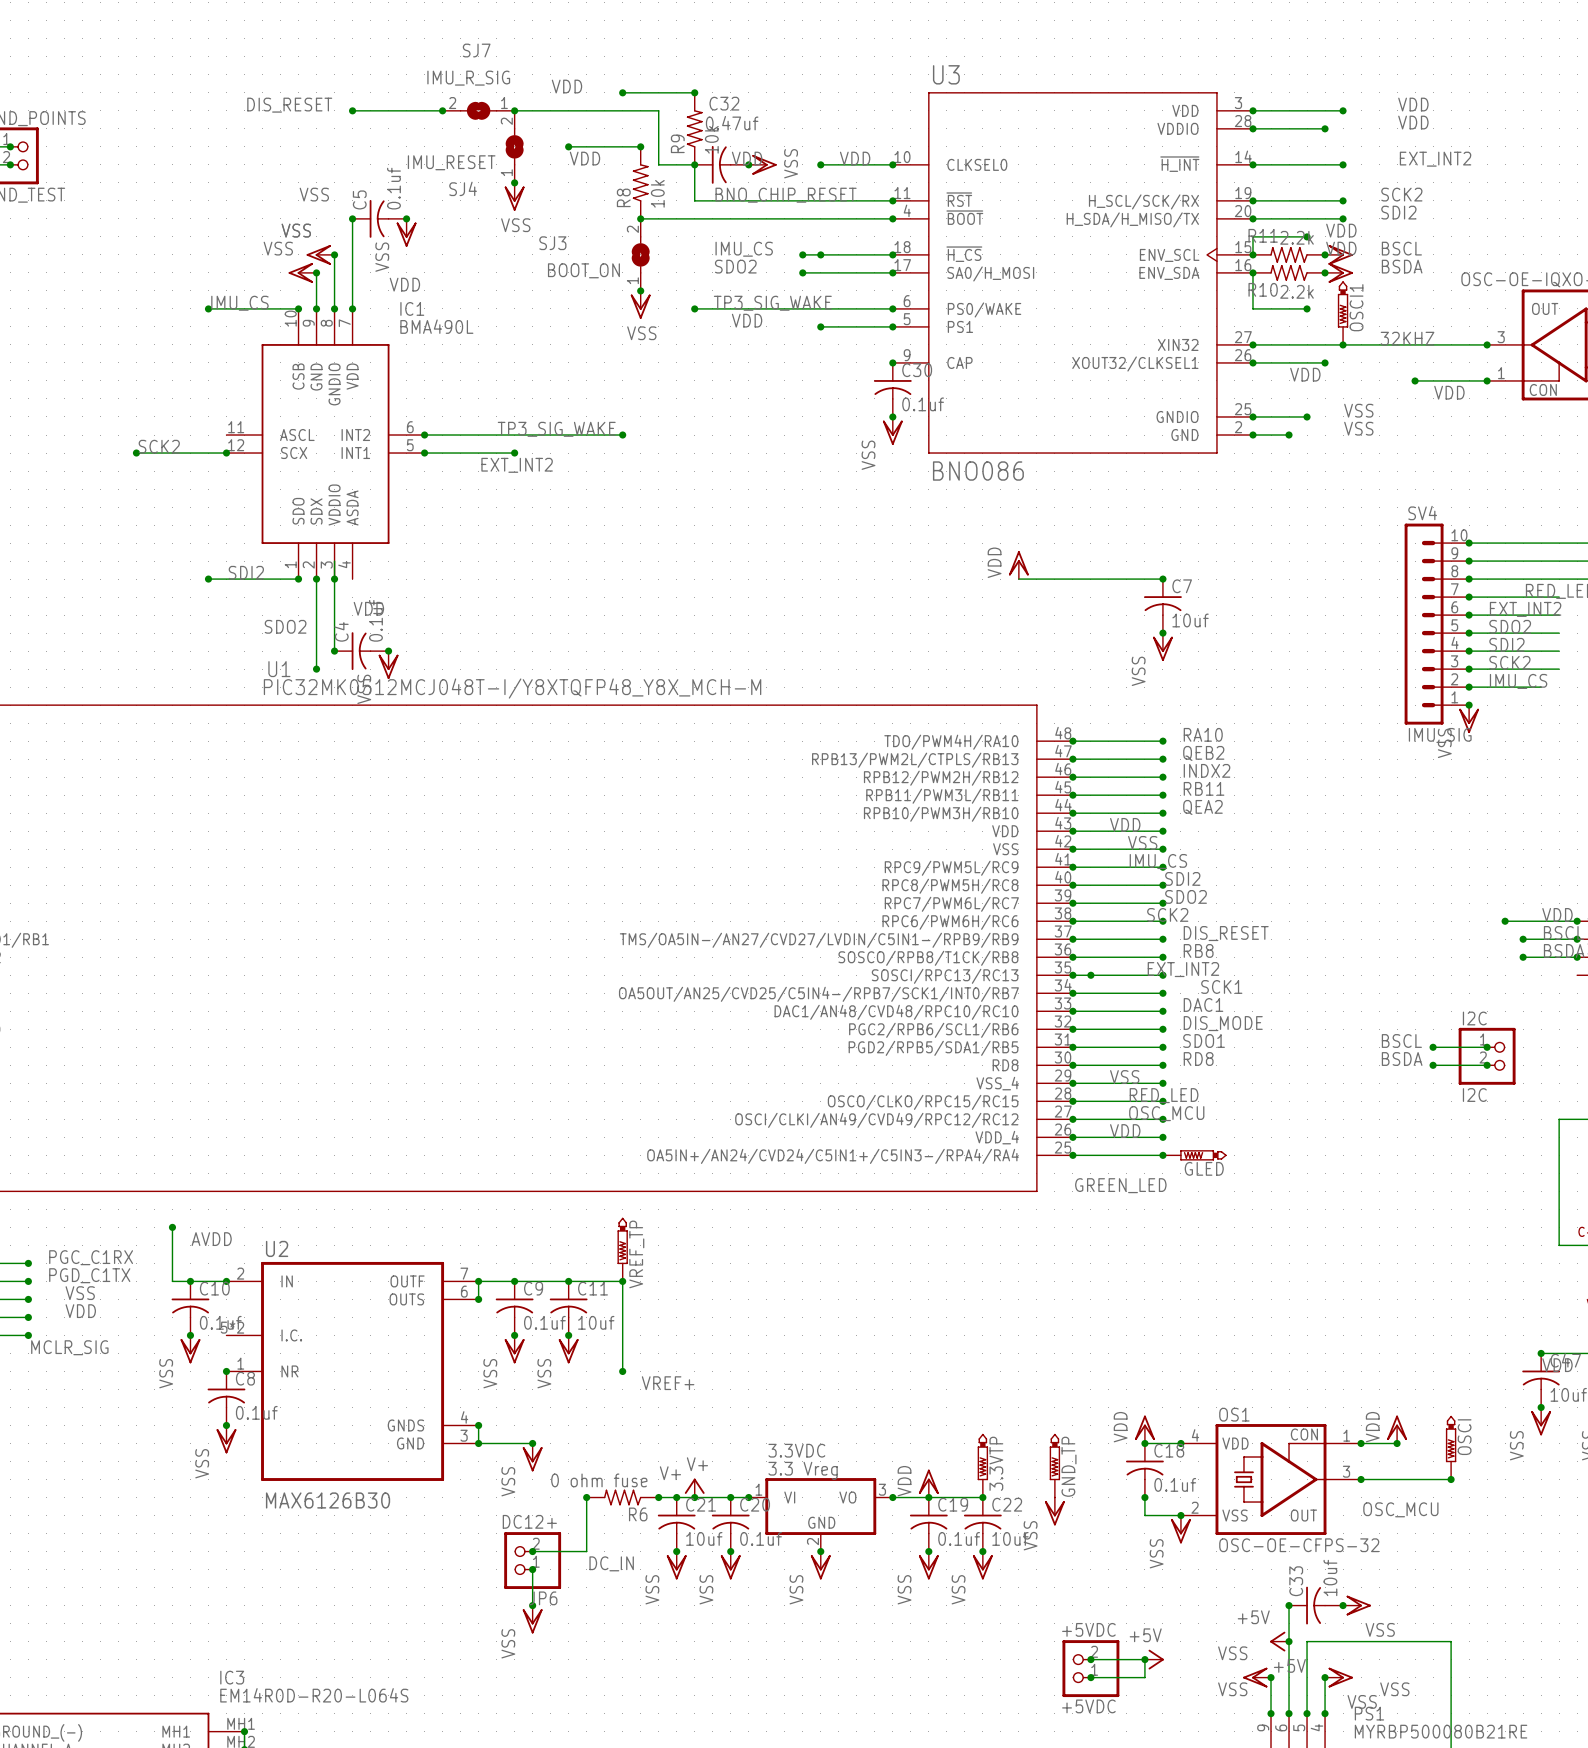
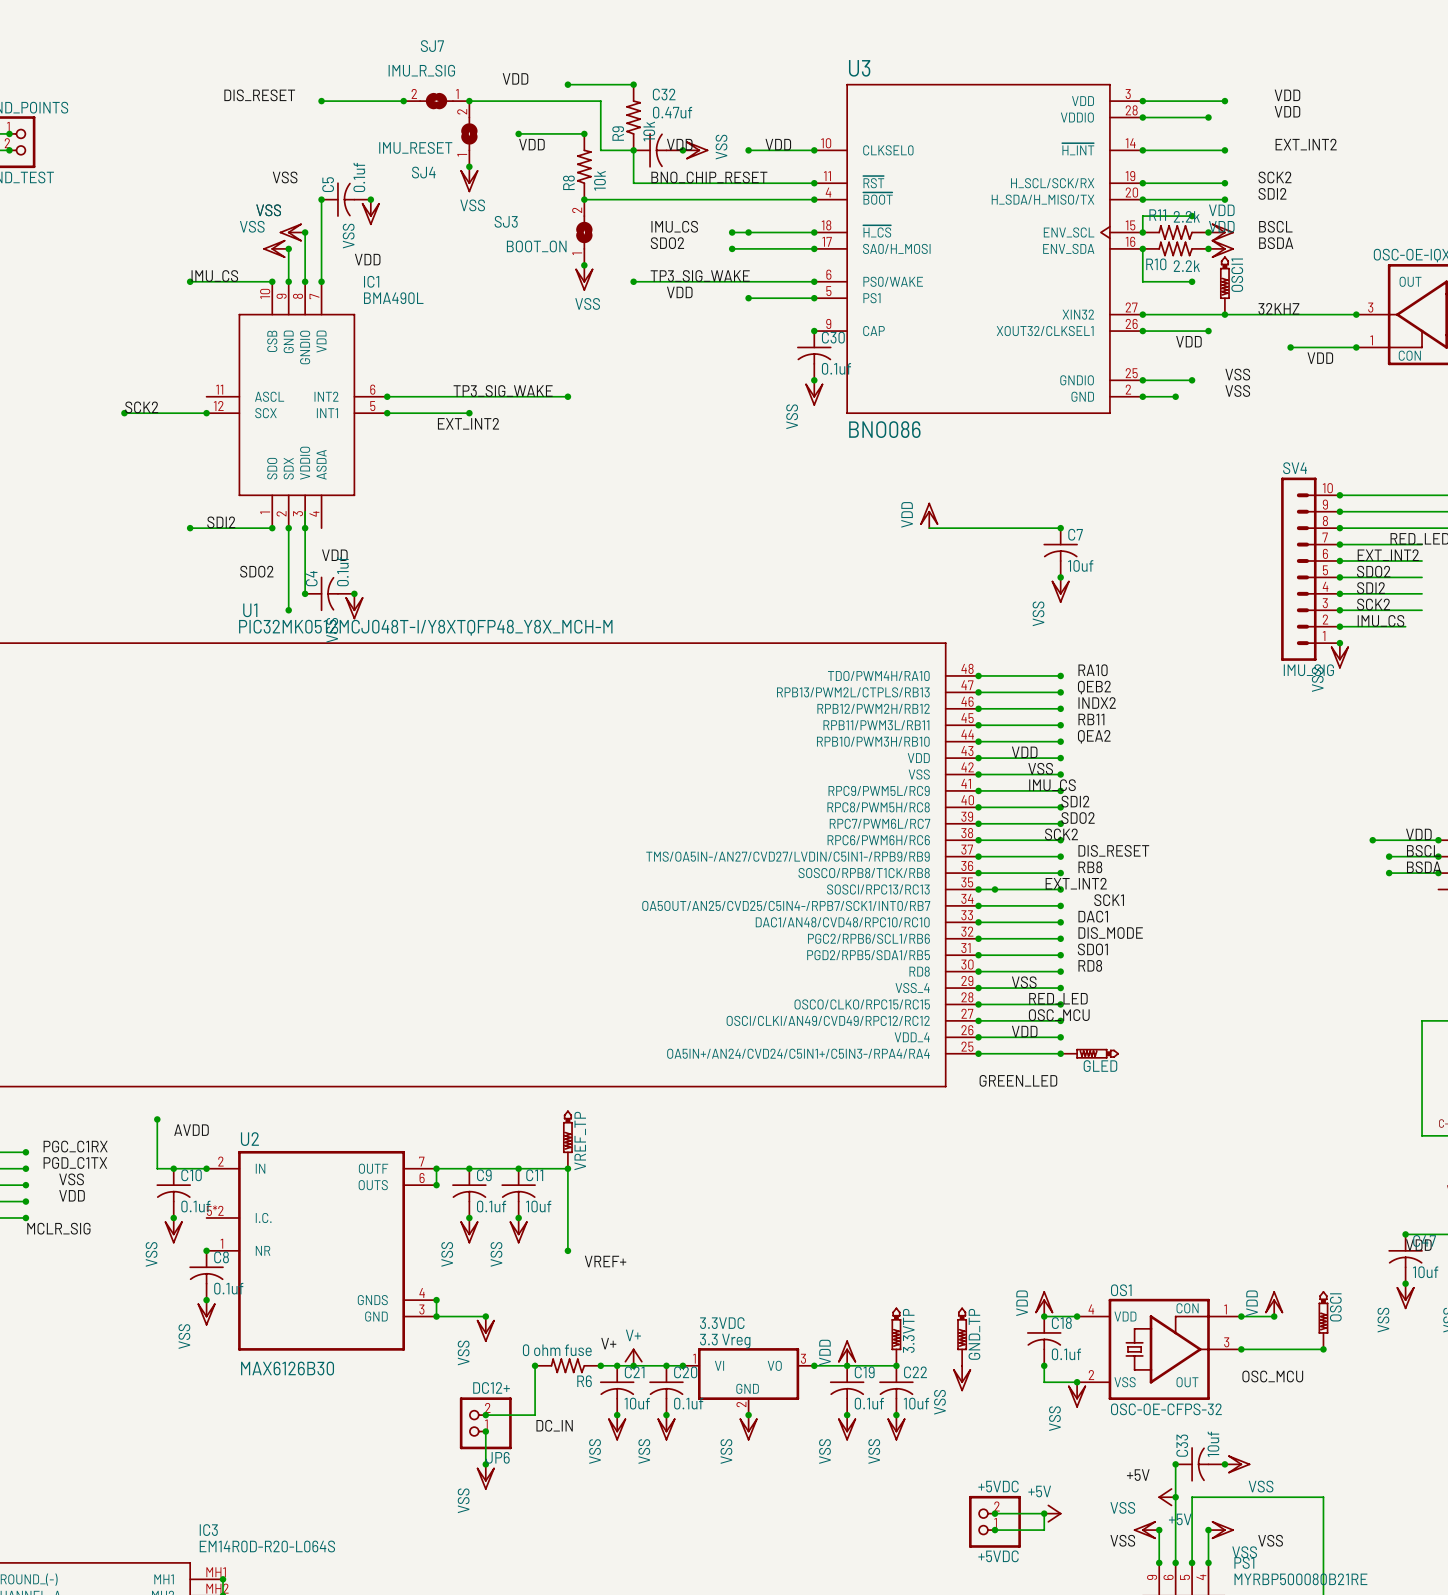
label: BSCL (1401, 1041) -> none
wire: (1433, 1047) (1487, 1047) -> none
junction: (1433, 1047) -> none
junction: (1487, 1047) -> none
I2C: I2C (1487, 1056) -> none
label: BSDA (1402, 1059) -> none
wire: (1433, 1065) (1487, 1065) -> none
junction: (1433, 1065) -> none
junction: (1487, 1065) -> none

